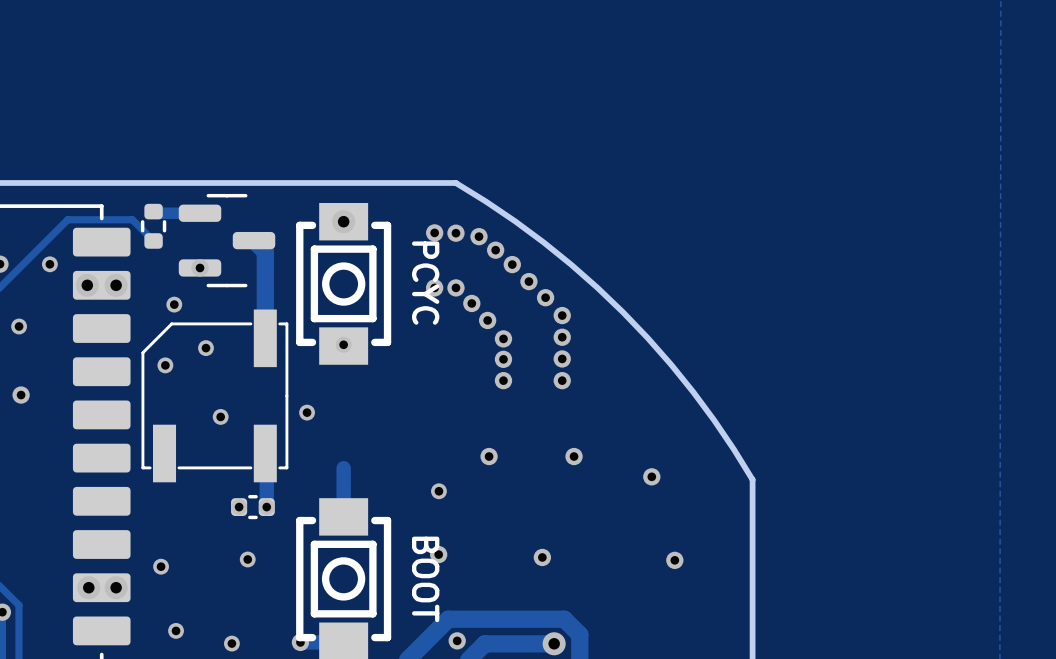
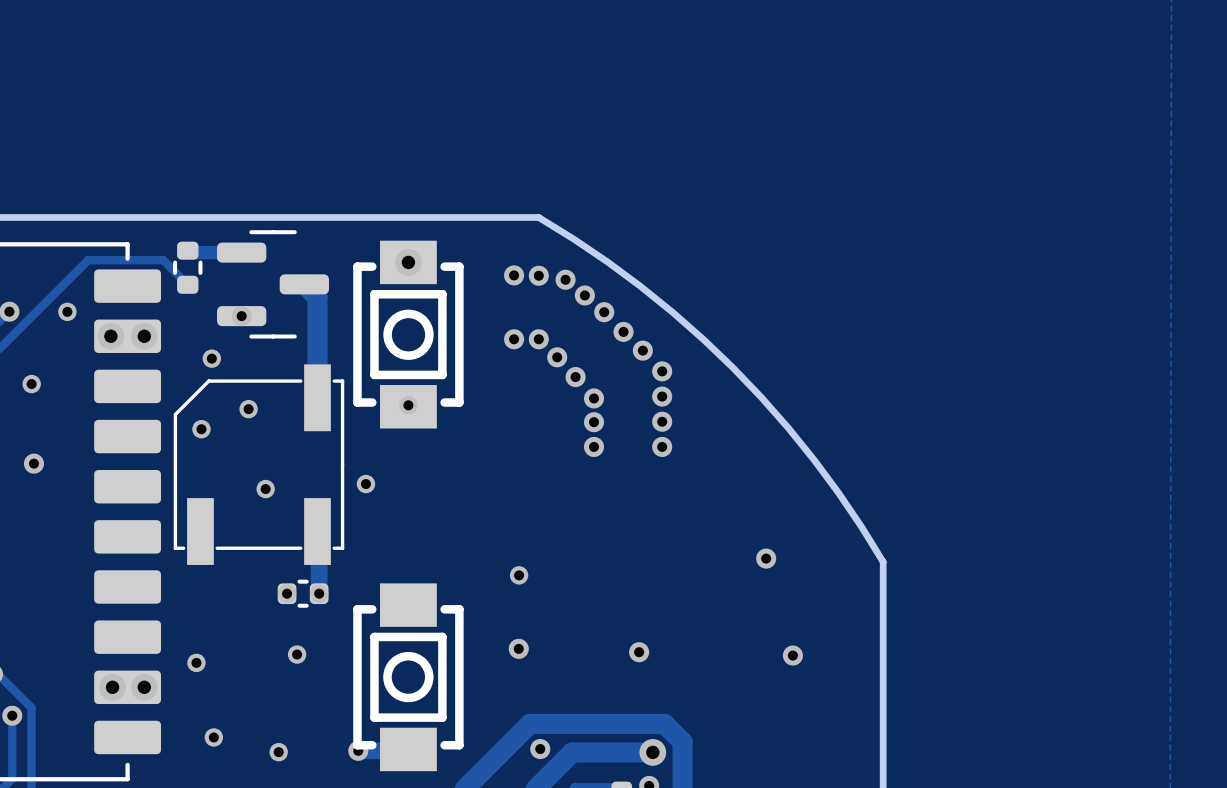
text: PCYC (425, 283) -> none
via: (489, 456) -> none
via: (574, 456) -> none
track: (343, 468) (343, 516) -> none
text: BOOT (425, 579) -> none

